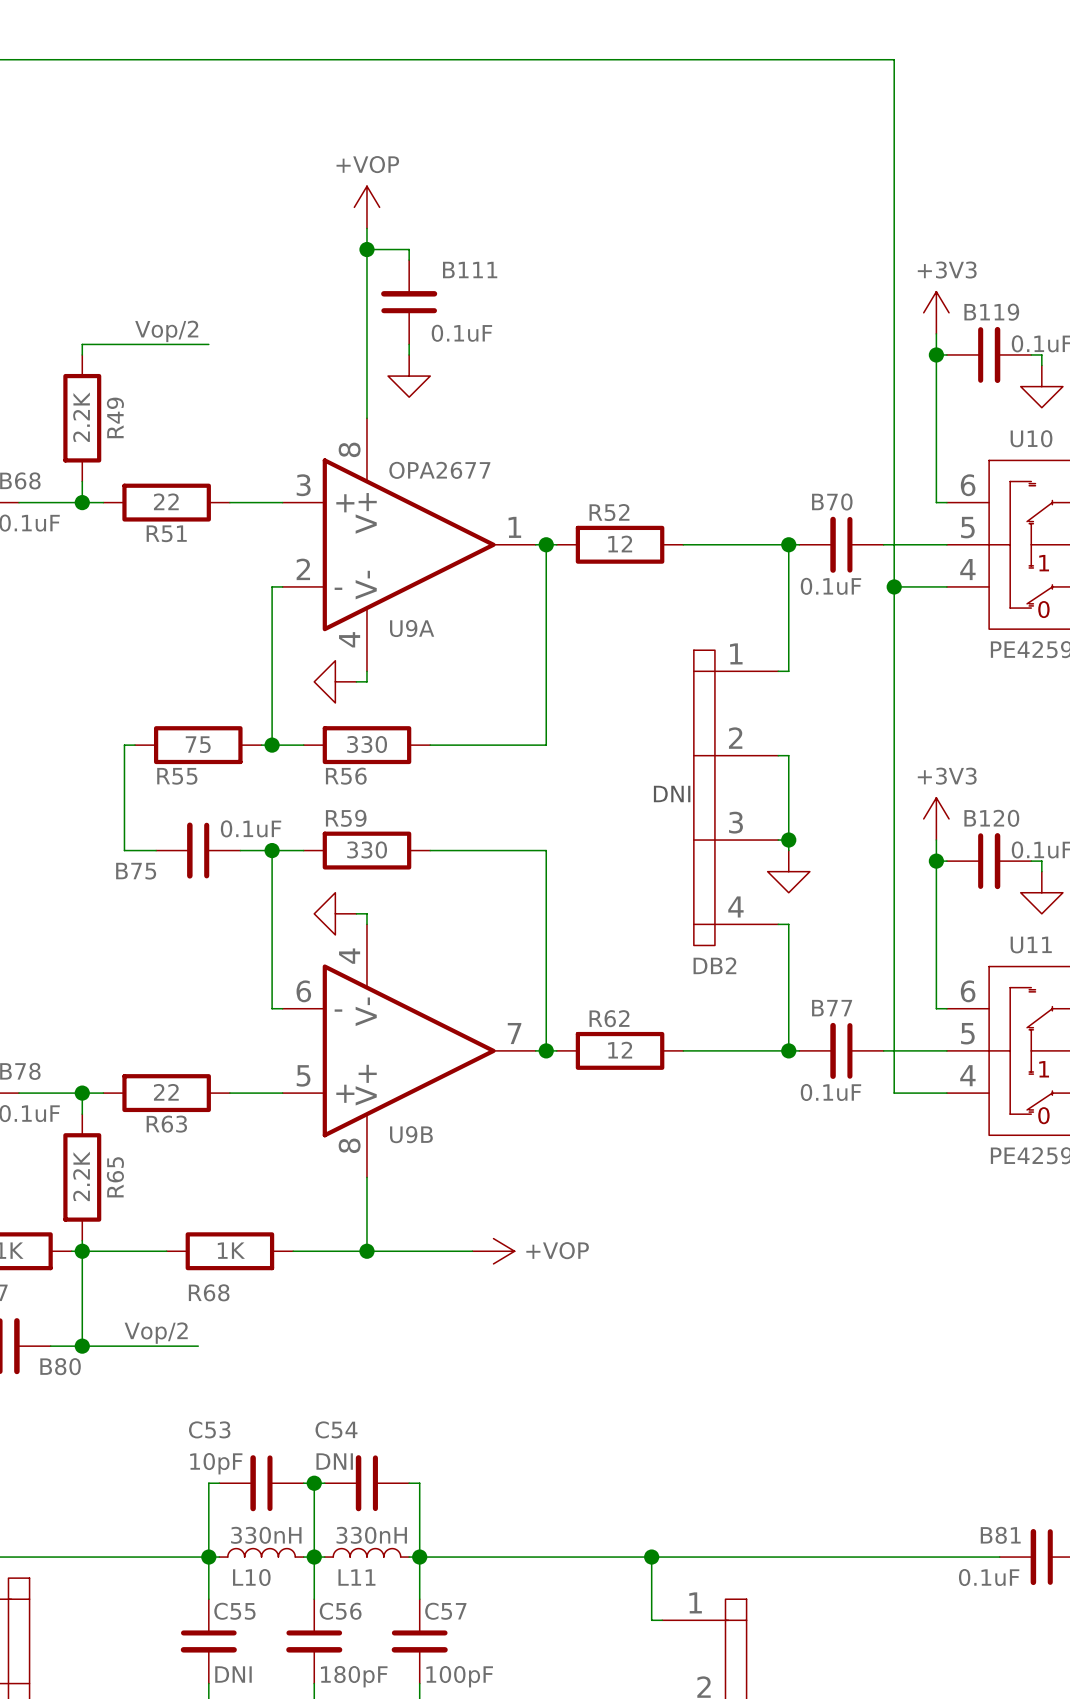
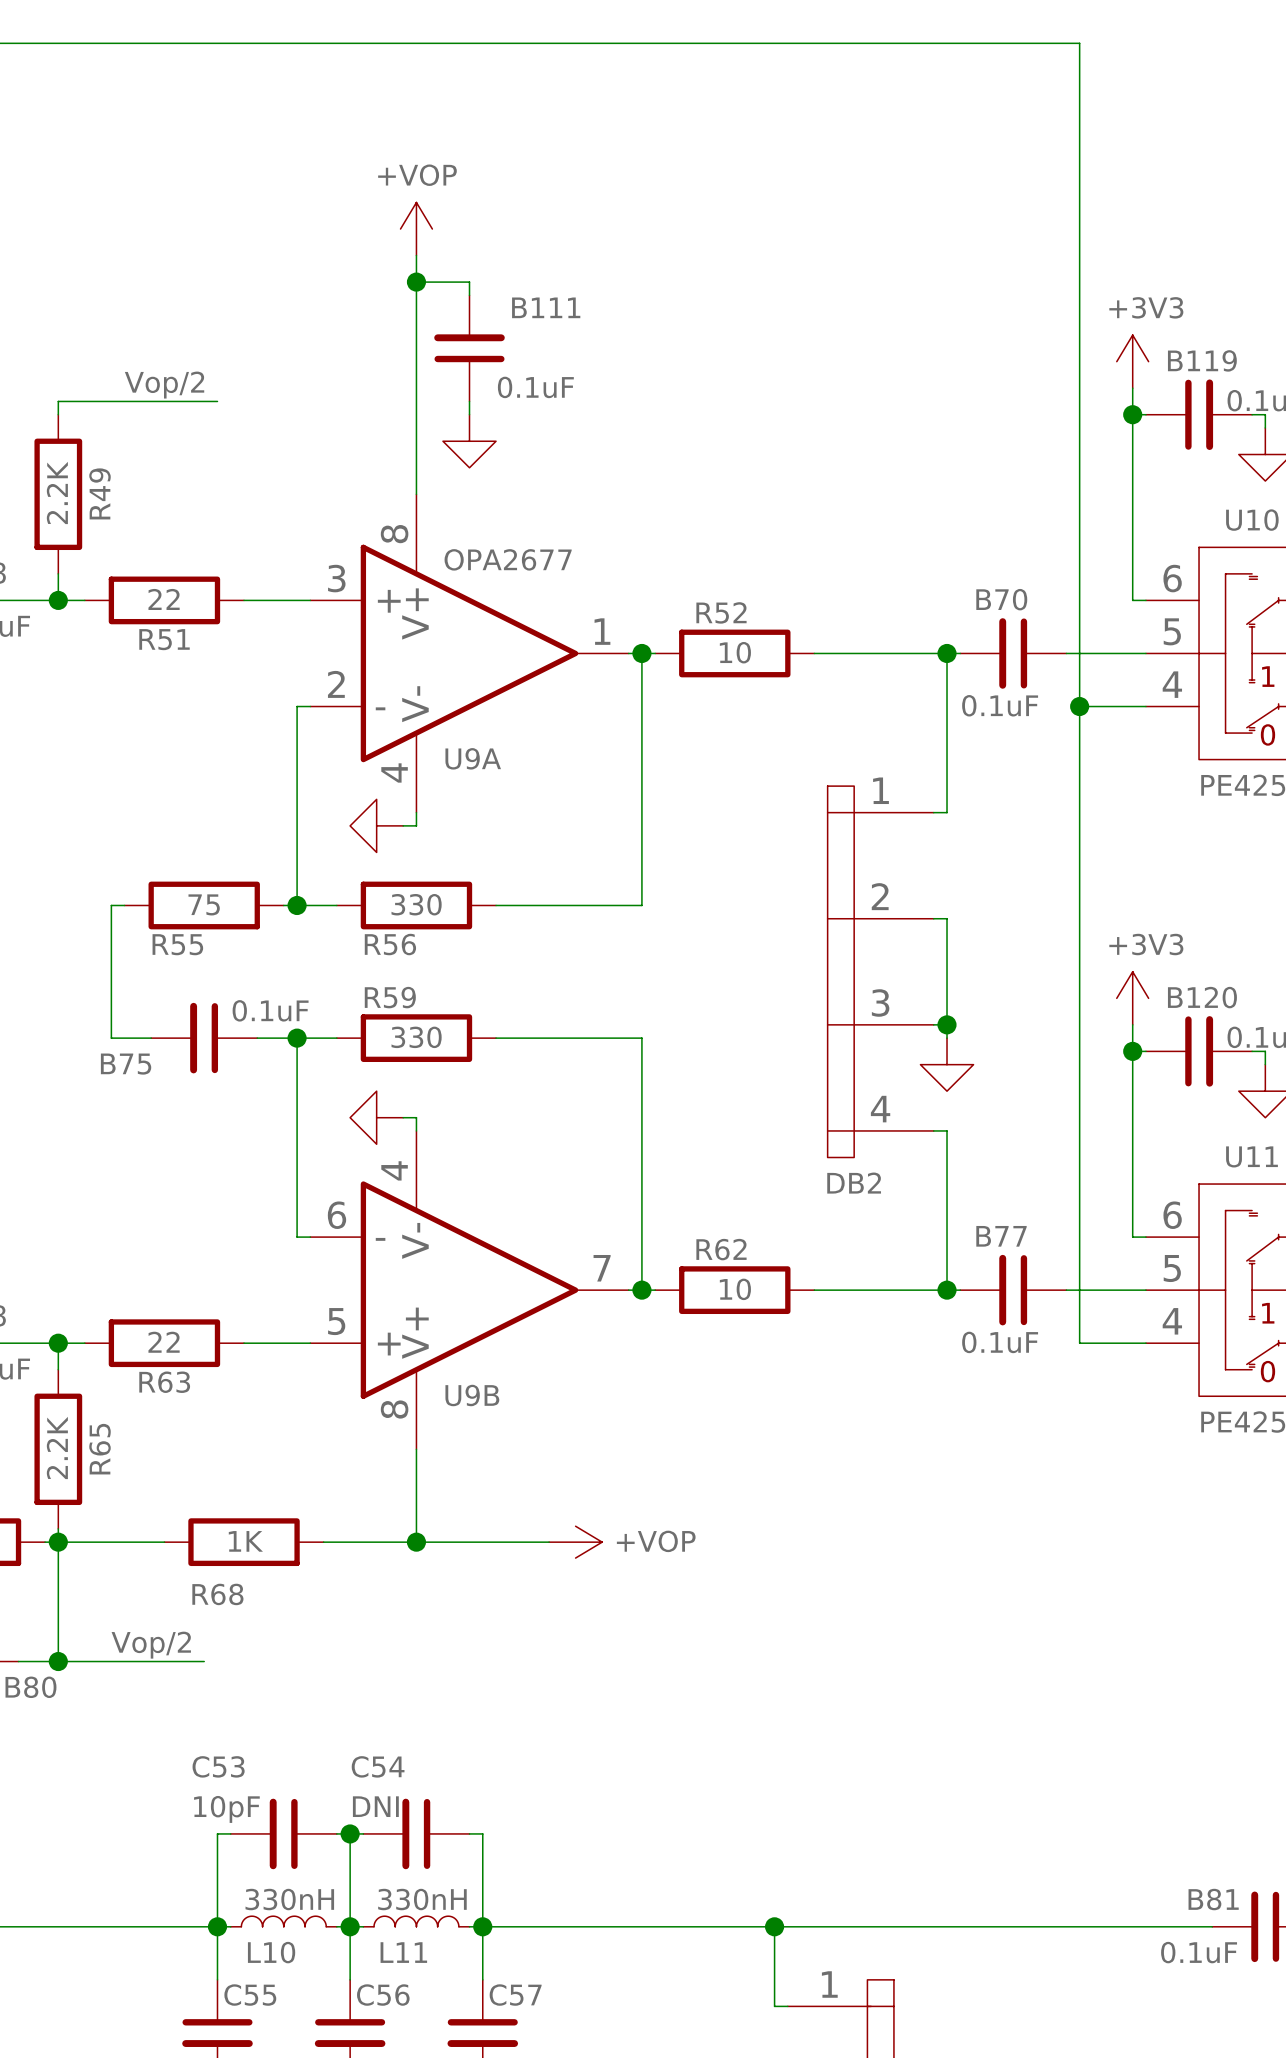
R52 value: 12 (620, 544) -> 10 (735, 652)
text: DNI (672, 794) -> none
R62 value: 12 (620, 1050) -> 10 (735, 1289)

